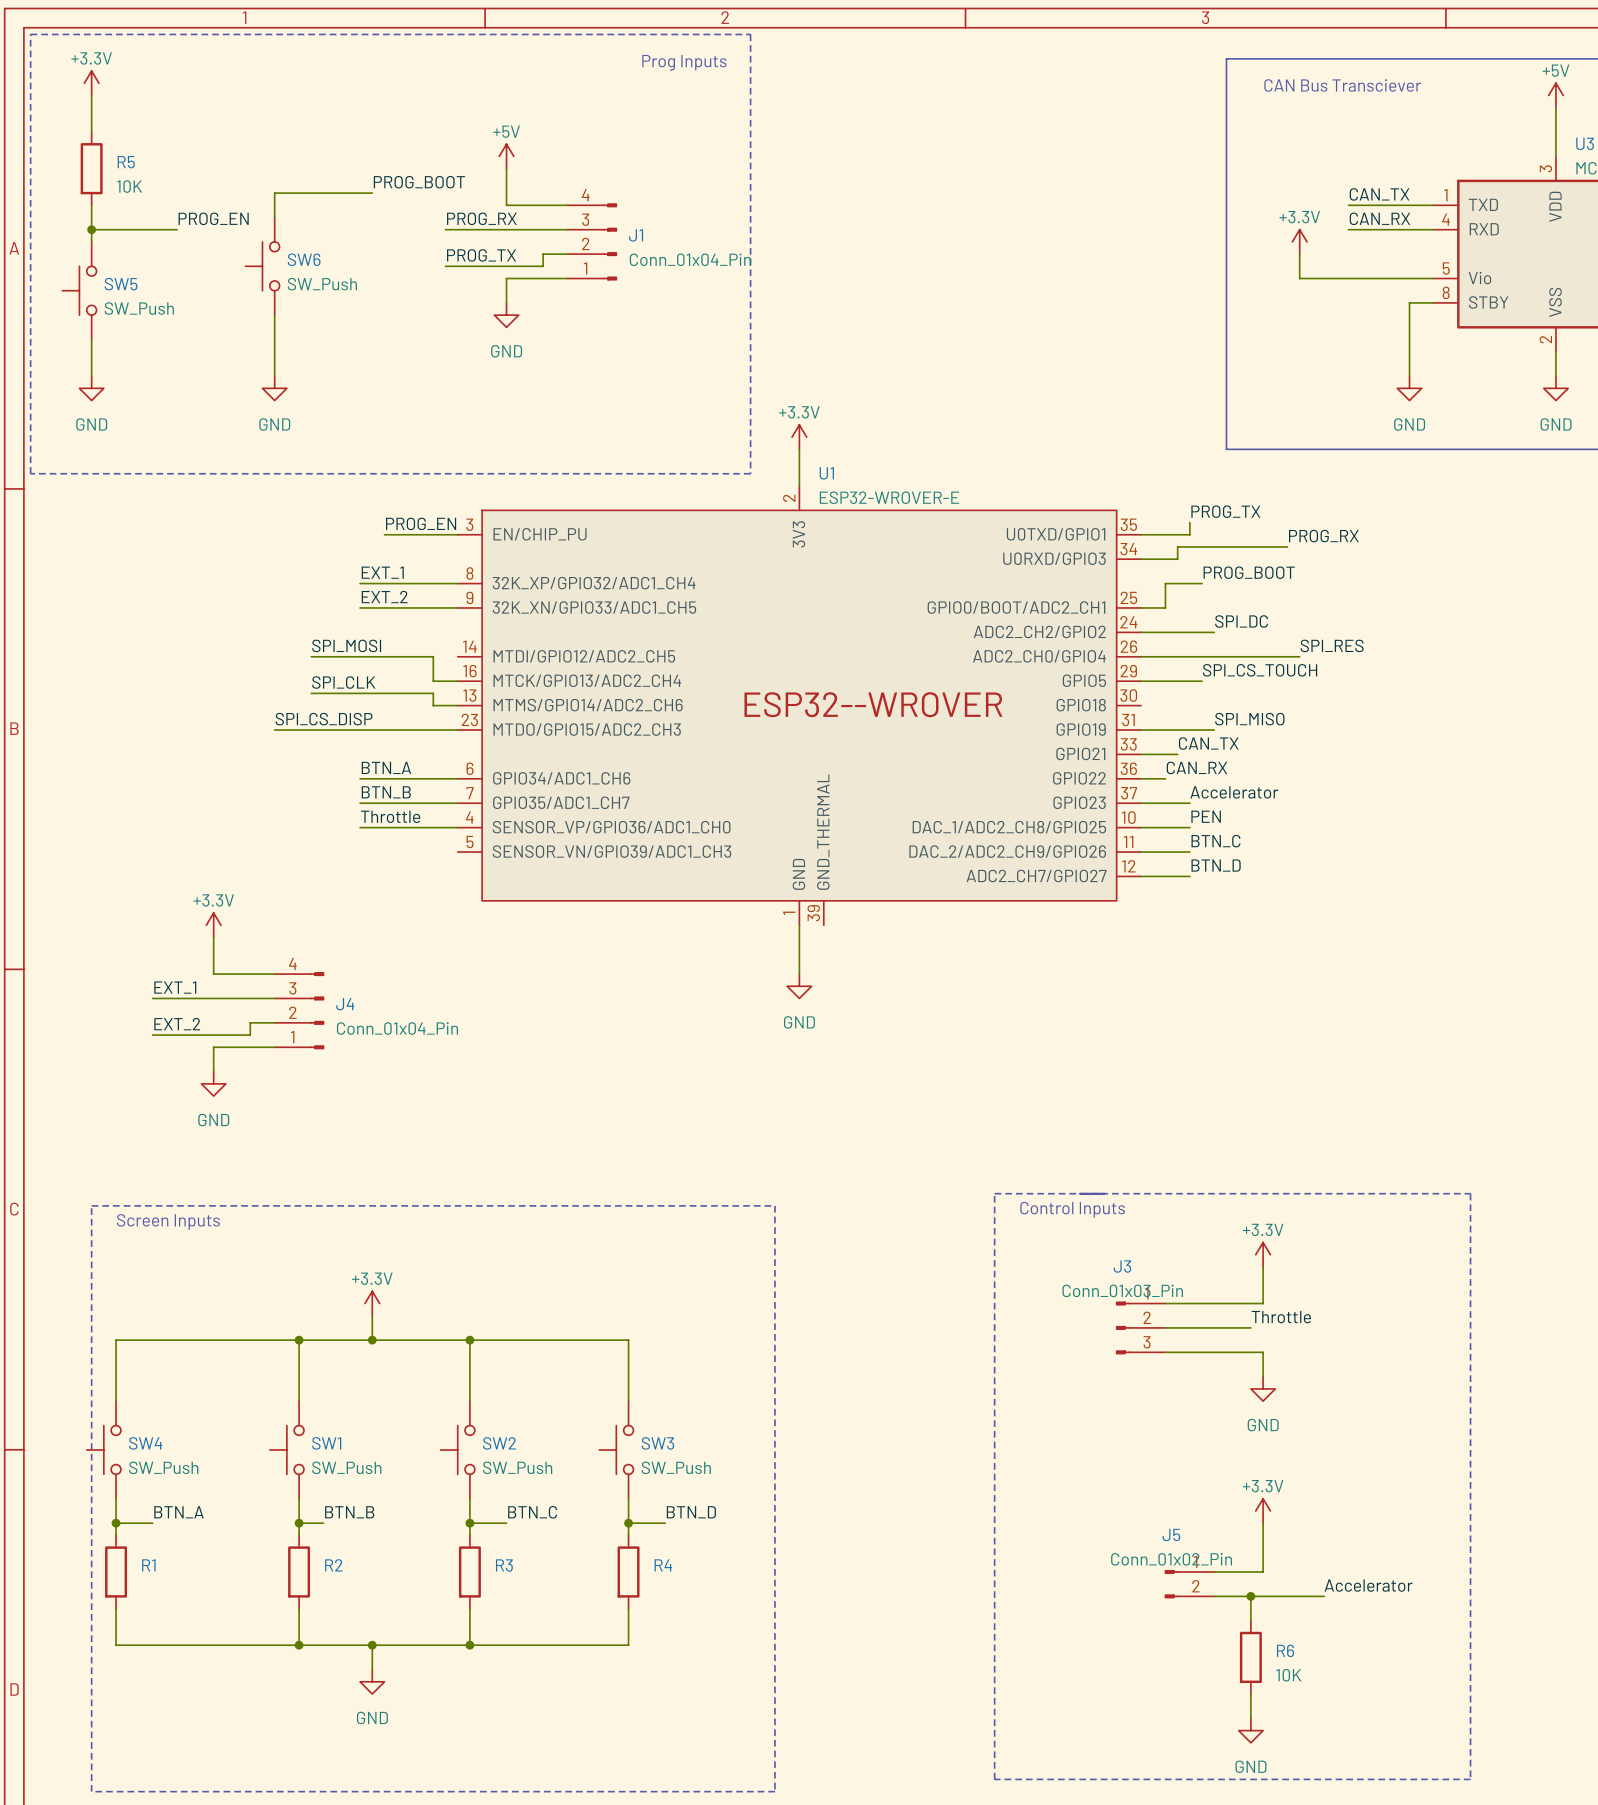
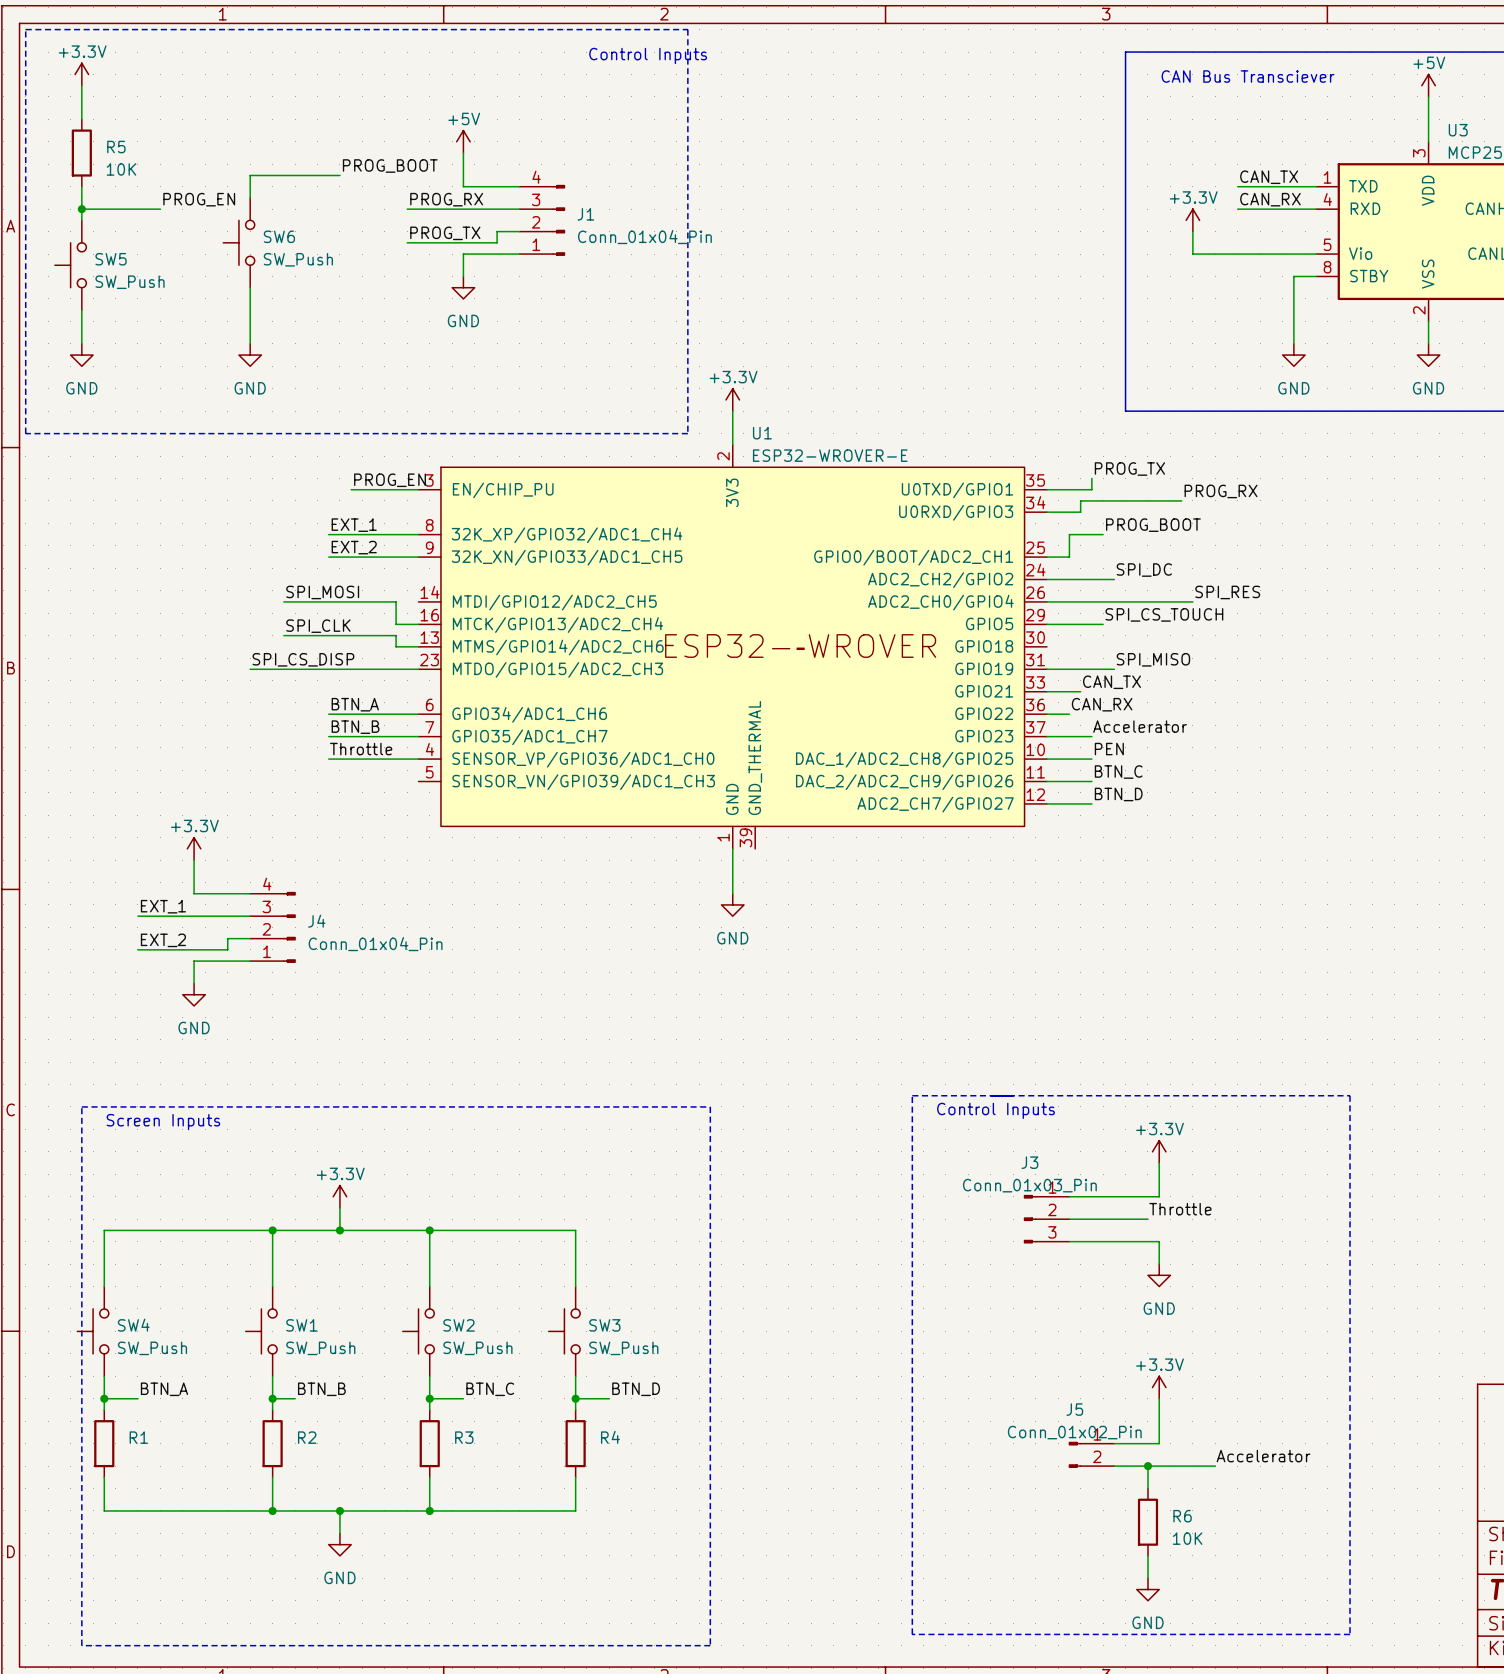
text: Prog Inputs (684, 62) -> Control Inputs (648, 55)

